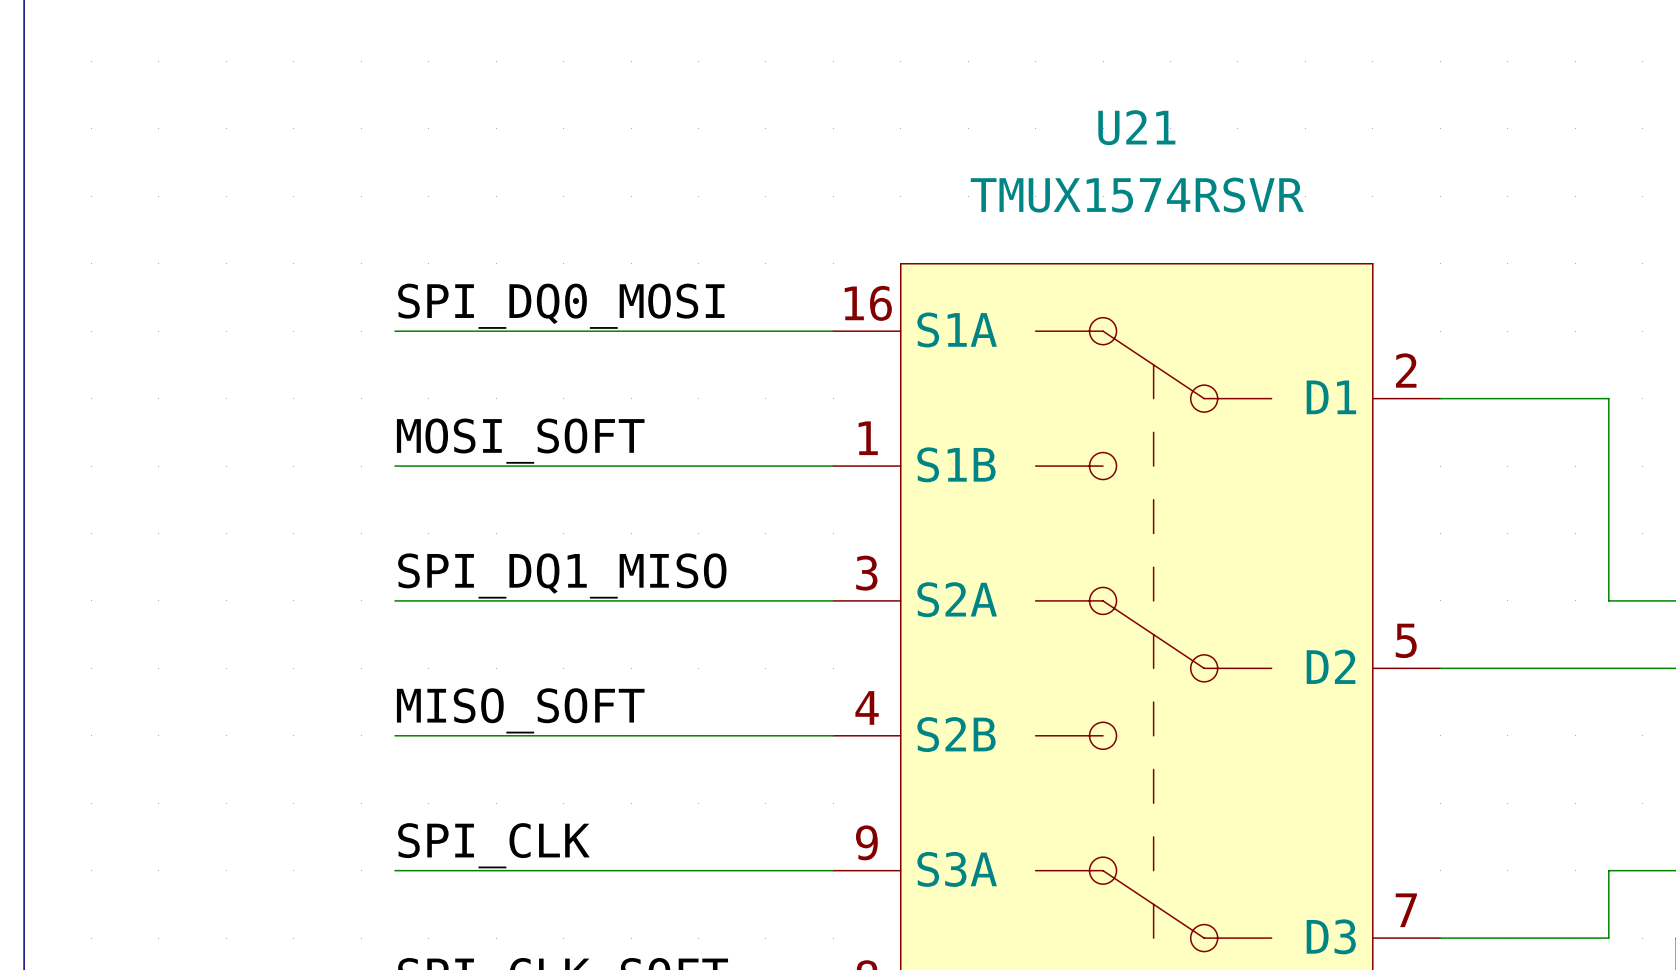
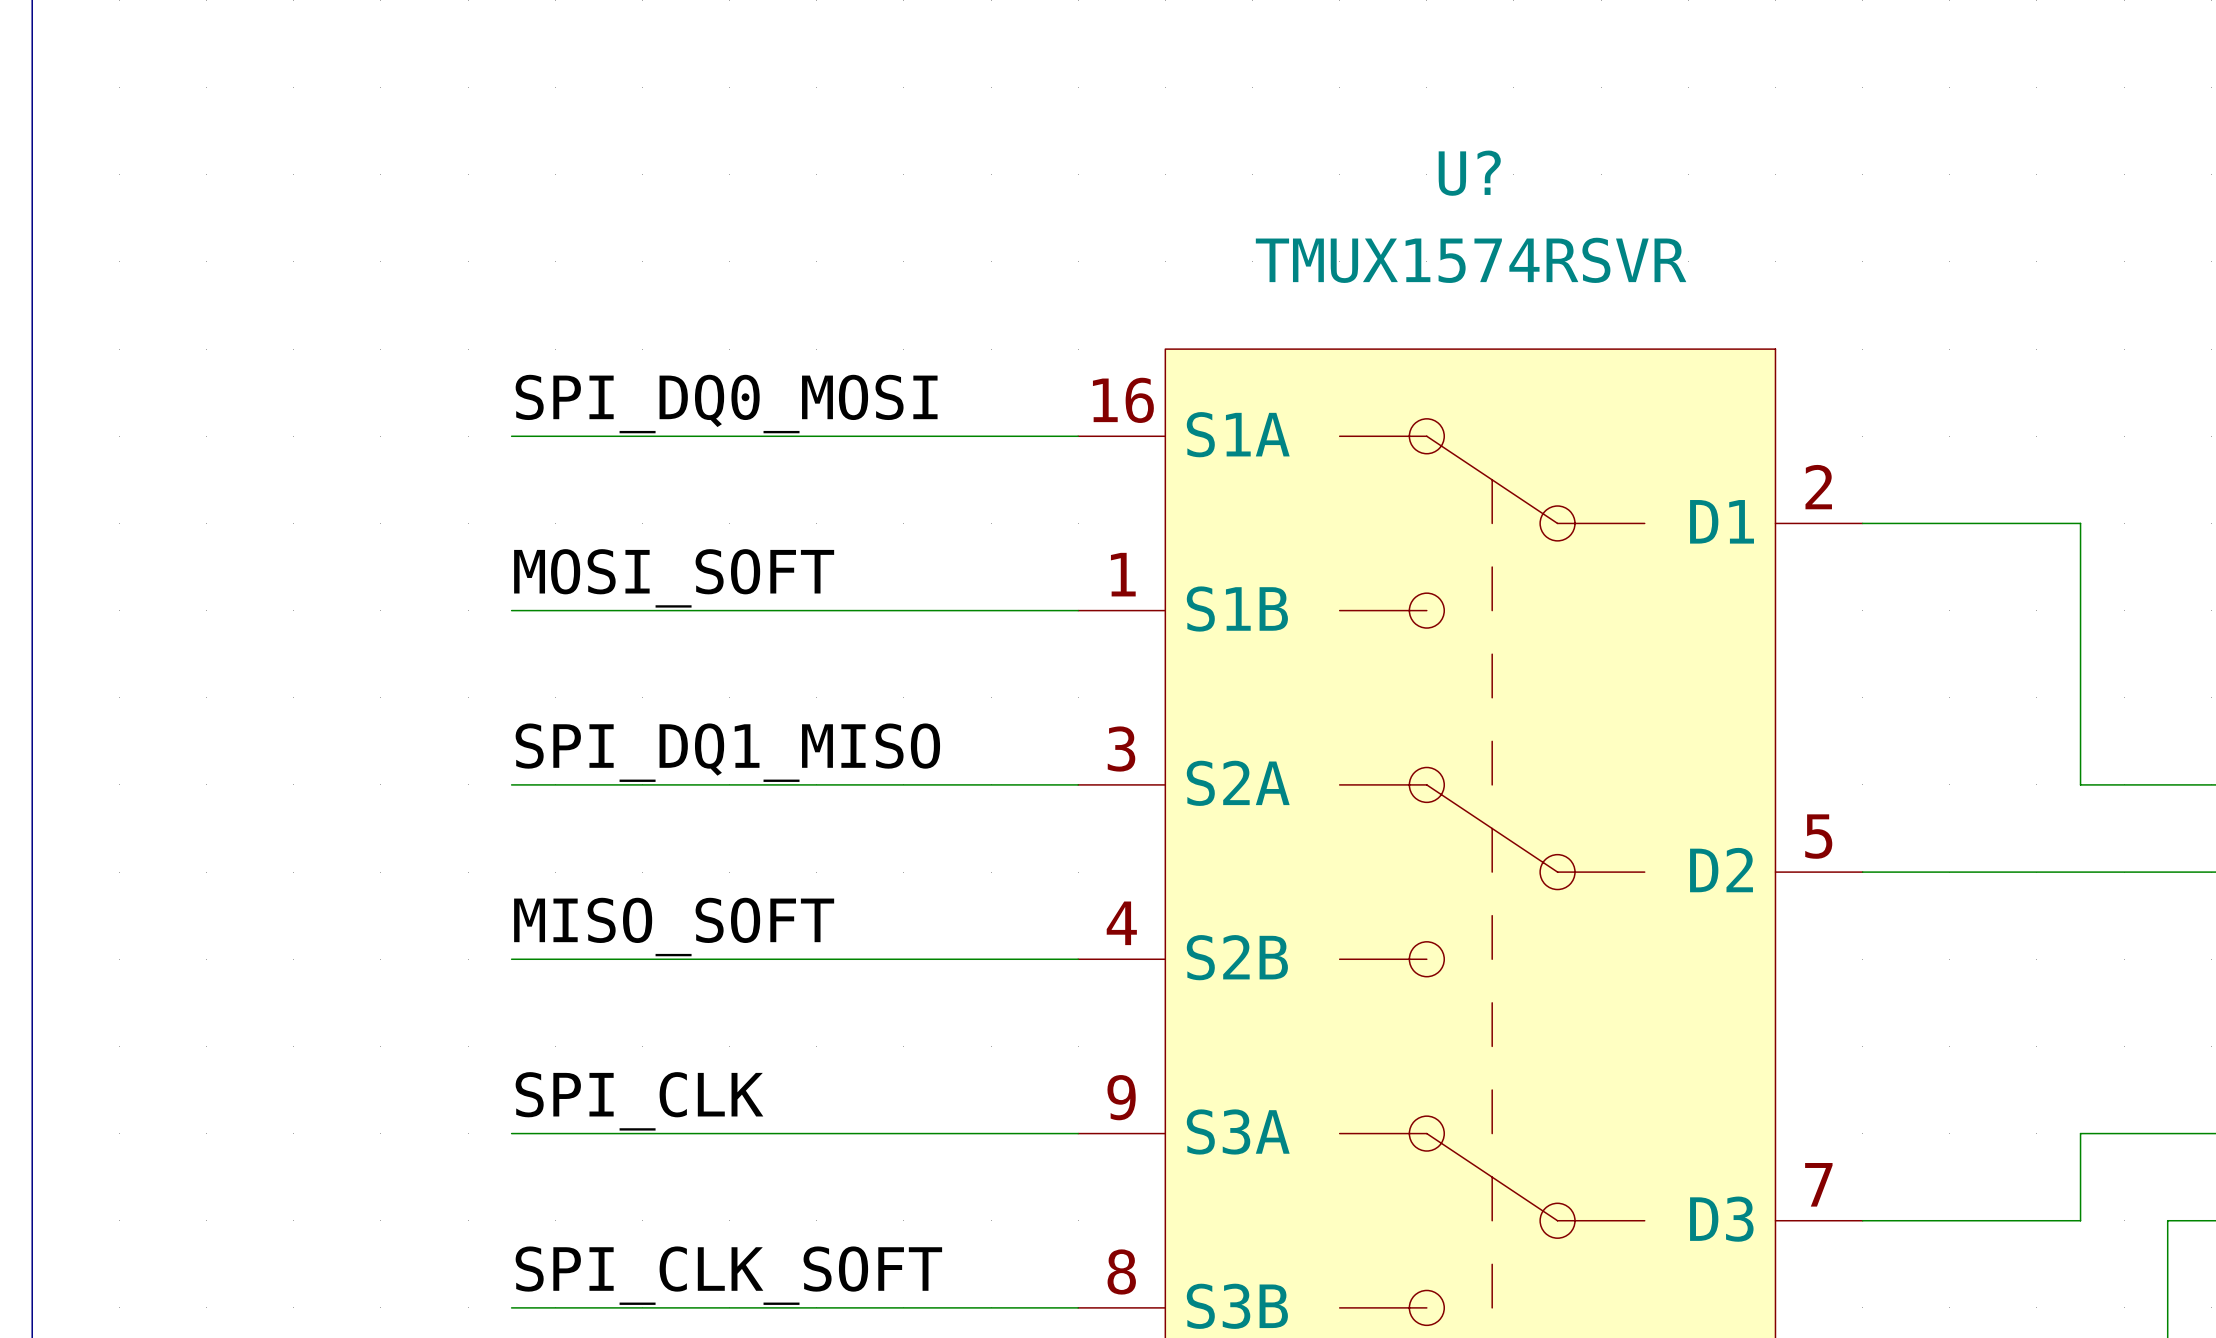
U21 name: U21 (1136, 127) -> U? (1469, 173)

